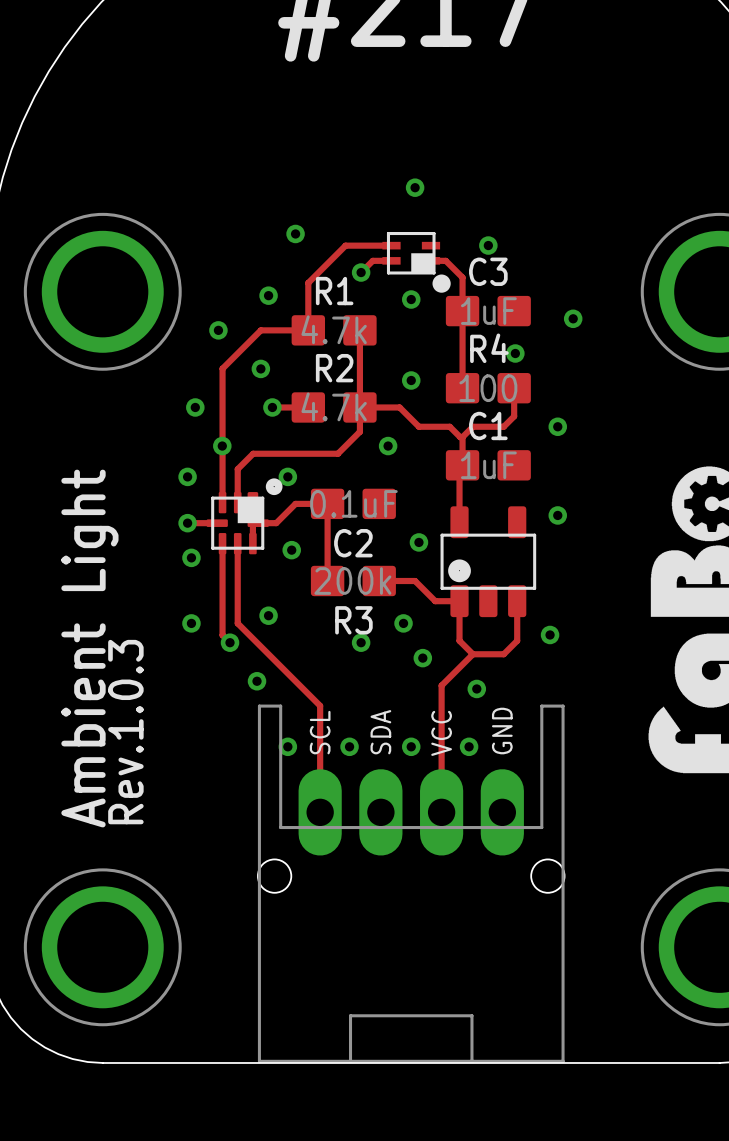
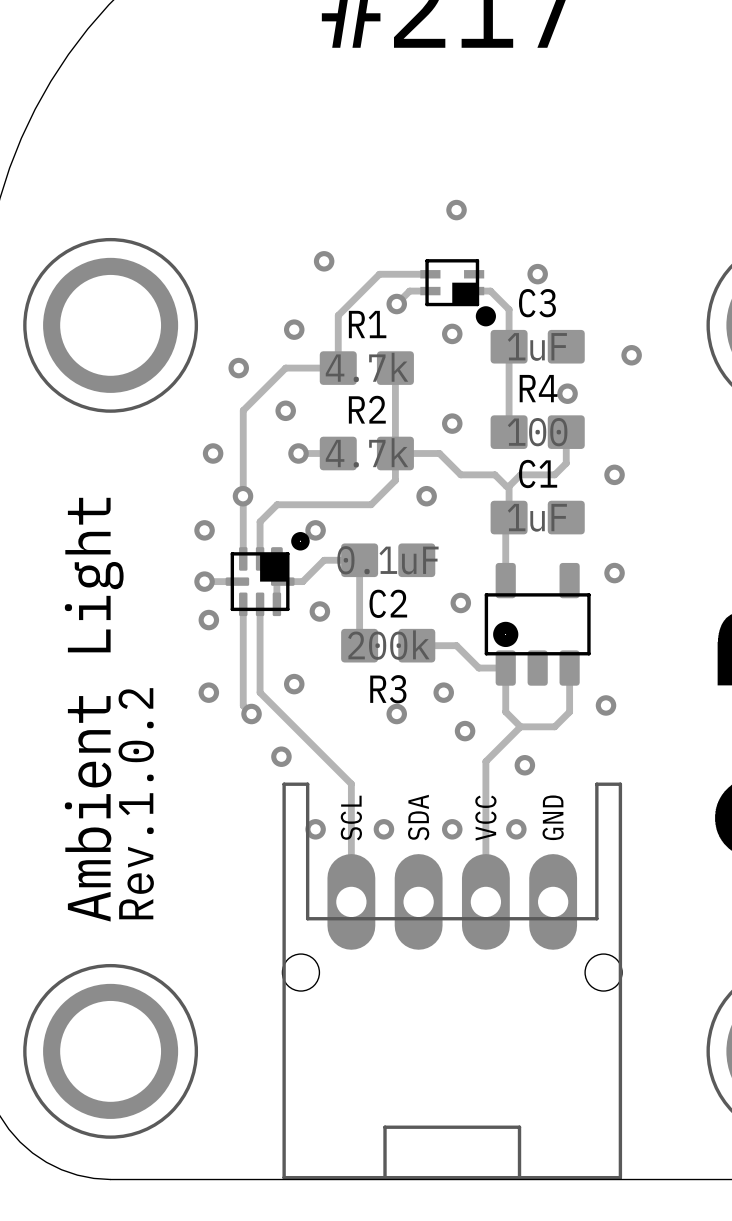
text: Rev.1.0.3 (125, 732) -> Rev.1.0.2 (136, 803)

